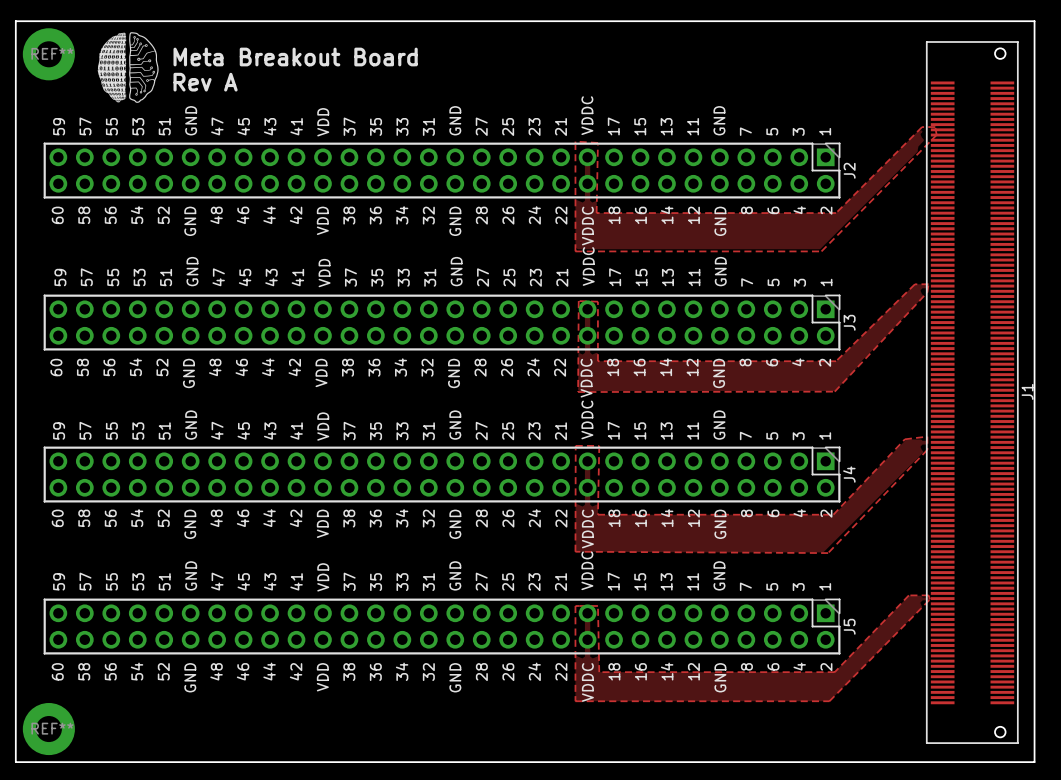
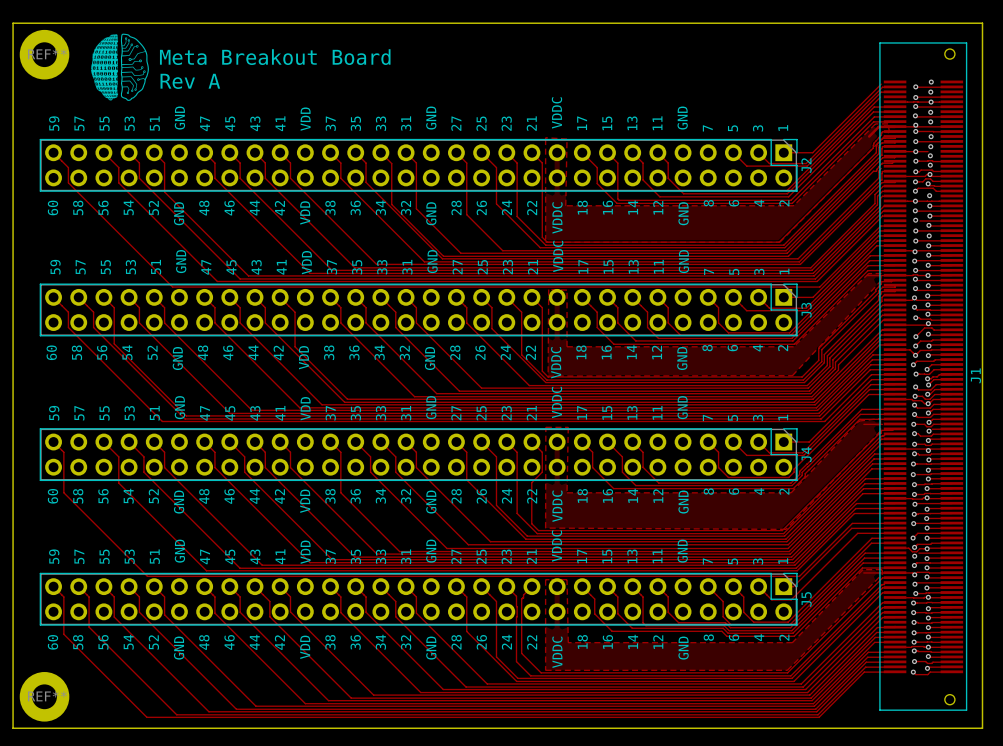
via: none -> (931, 82)
track: none -> (881, 84) (812, 152) (783, 152)
track: none -> (895, 87) (882, 87) (806, 163) (769, 163) (758, 152)
track: none -> (915, 86) (951, 87)
via: none -> (915, 86)
track: none -> (895, 92) (881, 92) (807, 166) (746, 166) (733, 152)
via: none -> (930, 92)
track: none -> (880, 97) (786, 191)
track: none -> (951, 97) (915, 97)
via: none -> (915, 97)
track: none -> (895, 102) (951, 102)
via: none -> (931, 102)
track: none -> (915, 106) (951, 107)
via: none -> (915, 106)
track: none -> (895, 107) (874, 107) (787, 193) (683, 193) (668, 178) (668, 163) (657, 152)
track: none -> (895, 111) (873, 111) (788, 196) (659, 196) (643, 180) (643, 163) (632, 152)
via: none -> (930, 112)
track: none -> (915, 115) (951, 116)
via: none -> (915, 115)
track: none -> (895, 116) (874, 116) (790, 200) (619, 200) (617, 163) (607, 152)
track: none -> (895, 121) (873, 121) (792, 203) (616, 203) (597, 183) (597, 167) (582, 152)
via: none -> (930, 121)
via: none -> (915, 125)
track: none -> (951, 126) (917, 126) (915, 125) (914, 126) (878, 126) (869, 136)
track: none -> (915, 131) (951, 131)
via: none -> (915, 131)
track: none -> (895, 131) (882, 131) (875, 141)
track: none -> (895, 136) (895, 138) (882, 138) (878, 142)
via: none -> (931, 136)
track: none -> (875, 141) (873, 148) (779, 242) (547, 242) (542, 237) (542, 163) (531, 152)
track: none -> (895, 141) (882, 142) (879, 145) (878, 153) (784, 247) (540, 247) (496, 203) (496, 167) (481, 152)
track: none -> (915, 141) (951, 141)
via: none -> (915, 141)
track: none -> (878, 142) (876, 144) (876, 152) (783, 245) (545, 245) (517, 216) (517, 163) (506, 152)
track: none -> (895, 146) (882, 146) (881, 155) (786, 250) (502, 250) (466, 214) (466, 163) (456, 152)
via: none -> (930, 146)
track: none -> (895, 151) (928, 151)
via: none -> (915, 151)
track: none -> (53, 152) (68, 167) (68, 182) (172, 287) (819, 287) (880, 225) (895, 225)
track: none -> (103, 152) (118, 167) (118, 182) (217, 281) (817, 281) (882, 216) (895, 216)
track: none -> (129, 152) (139, 163) (139, 178) (240, 278) (815, 278) (883, 211) (895, 211)
track: none -> (154, 152) (164, 163) (164, 192) (248, 275) (814, 275) (883, 206) (895, 206)
track: none -> (204, 152) (214, 163) (214, 178) (310, 273) (813, 273) (880, 205) (880, 198) (882, 196) (895, 196)
track: none -> (229, 152) (240, 163) (240, 178) (332, 270) (811, 270) (877, 204) (877, 196) (882, 191) (895, 191)
track: none -> (254, 152) (265, 163) (265, 178) (354, 267) (810, 267) (874, 203) (874, 194) (883, 186) (895, 186)
track: none -> (280, 152) (290, 163) (290, 178) (376, 264) (800, 264) (882, 182) (895, 181)
track: none -> (330, 152) (340, 163) (340, 178) (424, 261) (799, 261) (881, 180) (882, 171) (895, 171)
track: none -> (355, 152) (366, 163) (366, 182) (442, 258) (798, 258) (878, 178) (881, 168)
track: none -> (380, 152) (391, 163) (391, 204) (443, 256) (788, 256) (878, 167)
track: none -> (406, 152) (416, 163) (416, 208) (460, 253) (787, 253) (882, 157) (895, 156)
via: none -> (930, 155)
track: none -> (895, 161) (882, 163) (878, 167)
track: none -> (915, 161) (951, 161)
via: none -> (915, 161)
via: none -> (930, 165)
via: none -> (915, 171)
track: none -> (951, 171) (921, 170) (915, 171)
via: none -> (929, 174)
track: none -> (895, 176) (925, 176) (927, 174) (931, 176) (951, 176)
via: none -> (915, 181)
track: none -> (951, 181) (933, 181) (930, 178) (925, 178) (922, 181) (915, 181)
track: none -> (928, 183) (934, 186) (951, 186)
via: none -> (928, 183)
track: none -> (915, 191) (918, 188) (933, 188) (936, 191) (951, 191)
via: none -> (915, 191)
via: none -> (929, 195)
track: none -> (895, 201) (951, 201)
via: none -> (915, 201)
track: none -> (929, 205) (951, 206)
via: none -> (929, 205)
track: none -> (915, 210) (951, 211)
via: none -> (915, 210)
track: none -> (929, 216) (951, 216)
via: none -> (929, 216)
via: none -> (915, 220)
track: none -> (920, 220) (951, 221)
track: none -> (928, 225) (951, 225)
via: none -> (928, 225)
track: none -> (895, 230) (879, 230) (812, 297) (783, 297)
track: none -> (915, 230) (951, 230)
via: none -> (915, 230)
track: none -> (895, 235) (878, 235) (806, 308) (769, 308) (758, 297)
via: none -> (929, 235)
track: none -> (895, 240) (877, 240) (807, 310) (746, 310) (733, 297)
track: none -> (951, 240) (915, 241)
via: none -> (915, 241)
track: none -> (895, 245) (876, 245) (789, 332) (728, 332) (718, 322) (718, 307) (708, 297)
track: none -> (928, 245) (951, 245)
via: none -> (928, 245)
track: none -> (895, 250) (951, 250)
via: none -> (915, 251)
track: none -> (895, 255) (870, 255) (790, 335) (680, 335) (668, 322) (668, 307) (657, 297)
track: none -> (928, 255) (951, 255)
via: none -> (928, 255)
track: none -> (895, 260) (869, 260) (791, 338) (658, 338) (647, 327) (647, 312) (632, 297)
track: none -> (951, 260) (914, 261)
via: none -> (914, 261)
track: none -> (895, 265) (868, 265) (793, 340) (635, 340) (617, 322) (617, 307) (607, 297)
track: none -> (928, 265) (951, 265)
via: none -> (928, 265)
track: none -> (915, 270) (951, 270)
via: none -> (915, 270)
track: none -> (895, 270) (867, 270) (794, 344) (613, 344) (597, 327) (597, 312) (582, 297)
track: none -> (866, 275) (951, 275)
via: none -> (928, 275)
track: none -> (915, 279) (951, 280)
via: none -> (915, 279)
track: none -> (895, 280) (881, 282) (875, 291) (818, 348) (818, 360) (802, 377) (548, 377) (542, 371) (542, 307) (531, 297)
track: none -> (895, 285) (895, 287) (882, 287) (821, 349) (821, 361) (803, 380) (546, 380) (521, 354) (521, 312) (506, 297)
track: none -> (951, 285) (928, 285)
via: none -> (928, 285)
track: none -> (915, 288) (917, 290) (951, 290)
via: none -> (915, 288)
track: none -> (895, 290) (881, 292) (878, 300) (824, 354) (824, 362) (804, 382) (545, 382) (491, 328) (491, 307) (481, 297)
track: none -> (895, 295) (883, 295) (881, 297) (881, 301) (827, 355) (827, 365) (807, 385) (529, 385) (466, 322) (466, 307) (456, 297)
via: none -> (927, 295)
track: none -> (951, 295) (927, 295)
track: none -> (53, 297) (68, 312) (68, 327) (162, 421) (824, 421) (871, 374) (895, 374)
track: none -> (78, 297) (93, 312) (93, 327) (185, 418) (821, 418) (870, 369) (895, 369)
track: none -> (103, 297) (114, 307) (114, 343) (186, 415) (819, 415) (870, 364) (895, 364)
track: none -> (129, 297) (139, 307) (139, 322) (229, 413) (818, 413) (872, 359) (895, 359)
track: none -> (154, 297) (164, 307) (164, 322) (252, 410) (817, 410) (873, 354) (895, 354)
track: none -> (204, 297) (214, 307) (214, 322) (299, 407) (816, 407) (879, 344) (895, 344)
track: none -> (229, 297) (240, 307) (240, 322) (321, 404) (815, 404) (880, 340) (895, 340)
track: none -> (254, 297) (265, 307) (265, 322) (344, 402) (814, 402) (881, 335) (895, 335)
track: none -> (280, 297) (295, 312) (295, 346) (347, 399) (812, 399) (882, 330) (895, 330)
track: none -> (330, 297) (340, 307) (340, 322) (414, 396) (811, 396) (838, 370) (838, 364) (883, 320) (895, 320)
track: none -> (355, 297) (366, 307) (366, 322) (436, 393) (810, 393) (835, 368) (835, 362) (882, 315) (895, 315)
track: none -> (380, 297) (395, 312) (395, 327) (459, 391) (809, 391) (832, 367) (832, 359) (882, 310) (895, 310)
track: none -> (406, 297) (416, 307) (416, 322) (481, 388) (808, 388) (829, 366) (829, 357) (882, 305) (895, 305)
via: none -> (914, 297)
track: none -> (895, 300) (912, 300) (914, 297) (916, 300) (951, 300)
track: none -> (927, 304) (951, 305)
via: none -> (927, 304)
track: none -> (914, 307) (917, 309) (951, 310)
via: none -> (914, 307)
track: none -> (927, 314) (951, 315)
via: none -> (927, 314)
track: none -> (915, 317) (951, 320)
via: none -> (915, 317)
via: none -> (928, 323)
track: none -> (895, 325) (928, 323) (951, 325)
track: none -> (951, 330) (924, 328) (915, 336)
track: none -> (928, 334) (951, 335)
via: none -> (928, 334)
via: none -> (915, 336)
track: none -> (951, 340) (920, 341) (915, 346)
track: none -> (951, 344) (928, 346)
via: none -> (915, 346)
via: none -> (928, 346)
track: none -> (895, 349) (910, 349) (915, 355) (920, 350) (951, 349)
track: none -> (951, 354) (928, 355)
via: none -> (915, 355)
via: none -> (928, 355)
track: none -> (951, 359) (916, 361) (913, 364)
via: none -> (913, 364)
track: none -> (951, 364) (931, 364) (927, 369)
via: none -> (927, 369)
track: none -> (951, 369) (934, 369) (929, 374) (916, 374)
via: none -> (916, 374)
track: none -> (951, 374) (939, 374) (927, 378)
via: none -> (927, 378)
track: none -> (895, 379) (871, 379) (809, 442) (783, 442)
track: none -> (951, 379) (933, 379) (928, 384)
track: none -> (895, 384) (870, 384) (802, 452) (769, 452) (758, 442)
track: none -> (951, 384) (936, 384) (930, 389) (918, 389) (915, 386)
via: none -> (928, 384)
via: none -> (915, 386)
track: none -> (895, 389) (869, 389) (803, 455) (746, 455) (733, 442)
track: none -> (951, 389) (934, 389) (927, 394)
track: none -> (895, 394) (868, 394) (794, 469) (794, 472) (788, 477) (728, 477) (718, 467) (718, 452) (708, 442)
via: none -> (927, 394)
track: none -> (951, 394) (934, 394) (930, 399) (915, 396)
via: none -> (915, 396)
track: none -> (895, 399) (921, 400) (924, 403) (928, 403) (933, 399) (951, 399)
via: none -> (928, 403)
track: none -> (951, 404) (933, 404) (930, 408) (917, 408) (914, 405)
via: none -> (914, 405)
track: none -> (895, 409) (861, 409) (799, 471) (799, 474) (791, 483) (658, 483) (643, 467) (643, 452) (632, 442)
track: none -> (951, 409) (933, 409) (928, 413)
via: none -> (928, 413)
track: none -> (895, 414) (860, 414) (802, 472) (802, 475) (792, 485) (635, 485) (622, 472) (622, 456) (607, 442)
via: none -> (914, 414)
track: none -> (951, 414) (933, 414) (930, 417) (917, 417) (914, 414)
track: none -> (895, 419) (859, 419) (805, 473) (805, 476) (793, 488) (613, 488) (592, 467) (592, 452) (582, 442)
track: none -> (951, 419) (932, 419) (929, 422)
via: none -> (929, 422)
track: none -> (863, 424) (882, 424)
via: none -> (913, 424)
track: none -> (951, 424) (933, 424) (931, 426) (913, 424)
track: none -> (895, 429) (881, 430) (782, 530) (538, 530) (531, 523) (531, 482) (542, 472) (542, 452) (531, 442)
track: none -> (932, 429) (951, 429)
via: none -> (929, 431)
track: none -> (914, 433) (920, 436) (951, 434)
via: none -> (914, 433)
track: none -> (895, 434) (885, 434) (880, 436) (783, 533) (537, 533) (517, 513) (517, 452) (506, 442)
track: none -> (895, 439) (881, 439) (784, 536) (527, 536) (496, 505) (496, 456) (481, 442)
track: none -> (951, 439) (928, 440)
via: none -> (928, 440)
track: none -> (53, 442) (63, 452) (63, 492) (147, 576) (799, 576) (852, 523) (895, 523)
track: none -> (103, 442) (118, 456) (118, 483) (206, 570) (797, 570) (854, 513) (895, 513)
track: none -> (129, 442) (143, 456) (143, 472) (240, 568) (796, 568) (855, 508) (895, 508)
track: none -> (154, 442) (164, 452) (164, 467) (262, 565) (794, 565) (856, 503) (895, 503)
track: none -> (204, 442) (214, 452) (214, 467) (310, 562) (793, 562) (862, 493) (895, 493)
track: none -> (229, 442) (244, 456) (244, 472) (332, 559) (792, 559) (863, 488) (895, 488)
track: none -> (254, 442) (265, 452) (265, 467) (354, 557) (791, 557) (864, 483) (895, 483)
track: none -> (280, 442) (290, 452) (290, 467) (376, 554) (790, 554) (865, 478) (895, 478)
track: none -> (330, 442) (340, 452) (340, 492) (399, 551) (789, 551) (871, 468) (895, 468)
track: none -> (355, 442) (370, 456) (370, 472) (446, 548) (787, 548) (872, 463) (895, 463)
track: none -> (380, 442) (395, 456) (395, 472) (468, 544) (788, 544) (873, 458) (895, 458)
track: none -> (406, 442) (416, 452) (416, 467) (490, 541) (786, 541) (874, 454) (895, 454)
track: none -> (456, 442) (466, 452) (466, 479) (526, 539) (785, 539) (880, 444) (895, 444)
via: none -> (914, 444)
track: none -> (951, 444) (914, 444)
track: none -> (895, 449) (951, 449)
via: none -> (928, 450)
track: none -> (914, 453) (951, 454)
via: none -> (914, 453)
track: none -> (951, 458) (928, 459)
via: none -> (928, 459)
via: none -> (913, 464)
track: none -> (951, 463) (913, 464)
track: none -> (951, 468) (928, 470)
via: none -> (928, 470)
track: none -> (951, 473) (916, 474)
via: none -> (913, 474)
track: none -> (951, 478) (928, 478)
via: none -> (928, 478)
track: none -> (951, 483) (914, 484)
via: none -> (914, 484)
track: none -> (927, 488) (951, 488)
via: none -> (927, 488)
track: none -> (951, 493) (914, 494)
via: none -> (914, 494)
via: none -> (927, 497)
track: none -> (895, 498) (951, 498)
via: none -> (914, 504)
track: none -> (951, 503) (914, 504)
via: none -> (927, 509)
track: none -> (951, 508) (927, 509)
track: none -> (930, 513) (914, 514)
track: none -> (930, 513) (951, 513)
via: none -> (914, 514)
via: none -> (926, 518)
track: none -> (926, 518) (951, 518)
track: none -> (951, 523) (913, 523)
via: none -> (913, 523)
track: none -> (927, 528) (951, 528)
via: none -> (927, 528)
track: none -> (895, 528) (851, 528) (793, 586) (783, 586)
track: none -> (895, 533) (857, 533) (791, 599) (771, 599) (758, 586)
track: none -> (951, 533) (917, 533) (913, 538)
track: none -> (895, 538) (871, 538) (788, 622) (753, 622) (743, 612) (743, 596) (733, 586)
via: none -> (913, 538)
track: none -> (927, 538) (951, 538)
via: none -> (927, 538)
track: none -> (895, 543) (871, 543) (789, 625) (731, 624) (723, 616) (723, 601) (708, 586)
track: none -> (951, 543) (917, 544) (914, 547)
track: none -> (895, 548) (908, 548) (912, 551) (916, 551) (919, 548) (951, 548)
via: none -> (914, 547)
via: none -> (927, 548)
track: none -> (895, 553) (865, 553) (790, 627) (730, 627) (725, 622) (678, 622) (668, 612) (668, 596) (657, 586)
track: none -> (918, 553) (951, 553)
via: none -> (914, 556)
track: none -> (895, 558) (864, 558) (791, 630) (729, 630) (724, 625) (645, 625) (643, 622) (643, 596) (632, 586)
via: none -> (927, 558)
track: none -> (951, 558) (927, 558)
track: none -> (895, 563) (863, 563) (792, 633) (728, 633) (723, 628) (632, 628) (617, 613) (617, 596) (607, 586)
track: none -> (951, 563) (917, 562) (914, 565)
via: none -> (914, 565)
track: none -> (895, 568) (862, 568) (794, 636) (726, 636) (721, 631) (612, 631) (594, 613) (594, 599) (582, 586)
track: none -> (927, 567) (951, 568)
via: none -> (927, 567)
track: none -> (863, 572) (912, 572) (914, 574) (917, 572) (951, 572)
via: none -> (914, 574)
track: none -> (927, 577) (951, 577)
via: none -> (927, 577)
track: none -> (895, 577) (882, 577) (787, 672) (541, 672) (521, 653) (521, 599) (531, 586)
track: none -> (895, 582) (882, 584) (790, 675) (530, 675) (516, 661) (516, 596) (506, 586)
track: none -> (951, 582) (914, 584)
via: none -> (914, 584)
track: none -> (53, 586) (63, 596) (63, 634) (146, 717) (819, 717) (864, 672) (895, 672)
track: none -> (78, 586) (89, 596) (89, 627) (176, 714) (818, 714) (865, 667) (895, 667)
track: none -> (103, 586) (114, 596) (114, 617) (208, 711) (816, 711) (866, 662) (895, 662)
track: none -> (129, 586) (139, 596) (139, 612) (236, 709) (815, 709) (867, 657) (895, 657)
track: none -> (154, 586) (164, 596) (164, 614) (255, 706) (814, 706) (868, 652) (895, 652)
track: none -> (204, 586) (214, 596) (214, 613) (305, 703) (813, 703) (874, 642) (895, 642)
track: none -> (229, 586) (240, 596) (240, 612) (328, 700) (812, 700) (875, 637) (895, 637)
track: none -> (254, 586) (269, 601) (269, 616) (351, 698) (811, 698) (876, 632) (895, 632)
track: none -> (280, 586) (290, 596) (290, 611) (373, 695) (809, 695) (877, 627) (895, 626)
track: none -> (330, 586) (340, 596) (340, 612) (420, 692) (807, 692) (882, 617) (895, 617)
track: none -> (355, 586) (366, 596) (366, 612) (443, 689) (805, 689) (882, 612) (895, 612)
track: none -> (380, 586) (395, 601) (395, 616) (465, 687) (803, 687) (882, 607) (895, 607)
track: none -> (406, 586) (416, 596) (416, 613) (487, 683) (801, 683) (882, 602) (895, 602)
track: none -> (456, 586) (466, 596) (466, 631) (516, 681) (793, 681) (882, 592) (895, 592)
track: none -> (481, 586) (496, 601) (496, 656) (517, 678) (791, 678) (882, 587) (895, 587)
via: none -> (926, 587)
track: none -> (951, 587) (926, 587)
track: none -> (929, 592) (951, 592)
track: none -> (929, 592) (915, 593)
via: none -> (915, 593)
track: none -> (895, 597) (951, 597)
via: none -> (928, 597)
via: none -> (913, 603)
track: none -> (951, 602) (913, 603)
track: none -> (951, 607) (928, 608)
via: none -> (928, 608)
track: none -> (913, 612) (951, 612)
via: none -> (913, 612)
track: none -> (951, 617) (928, 618)
via: none -> (928, 618)
track: none -> (914, 622) (951, 622)
via: none -> (914, 622)
track: none -> (928, 627) (951, 627)
via: none -> (928, 627)
track: none -> (914, 632) (926, 632)
via: none -> (914, 632)
track: none -> (951, 632) (926, 632)
track: none -> (928, 637) (951, 637)
via: none -> (928, 637)
track: none -> (914, 642) (927, 642)
via: none -> (914, 642)
track: none -> (927, 642) (951, 642)
via: none -> (928, 647)
track: none -> (895, 647) (951, 647)
track: none -> (914, 650) (951, 652)
via: none -> (914, 650)
track: none -> (928, 656) (951, 657)
via: none -> (928, 656)
track: none -> (914, 661) (925, 661) (927, 663) (951, 662)
via: none -> (914, 661)
track: none -> (951, 667) (927, 668)
via: none -> (927, 668)
track: none -> (913, 672) (915, 674) (927, 674) (930, 672) (951, 672)
via: none -> (913, 672)

